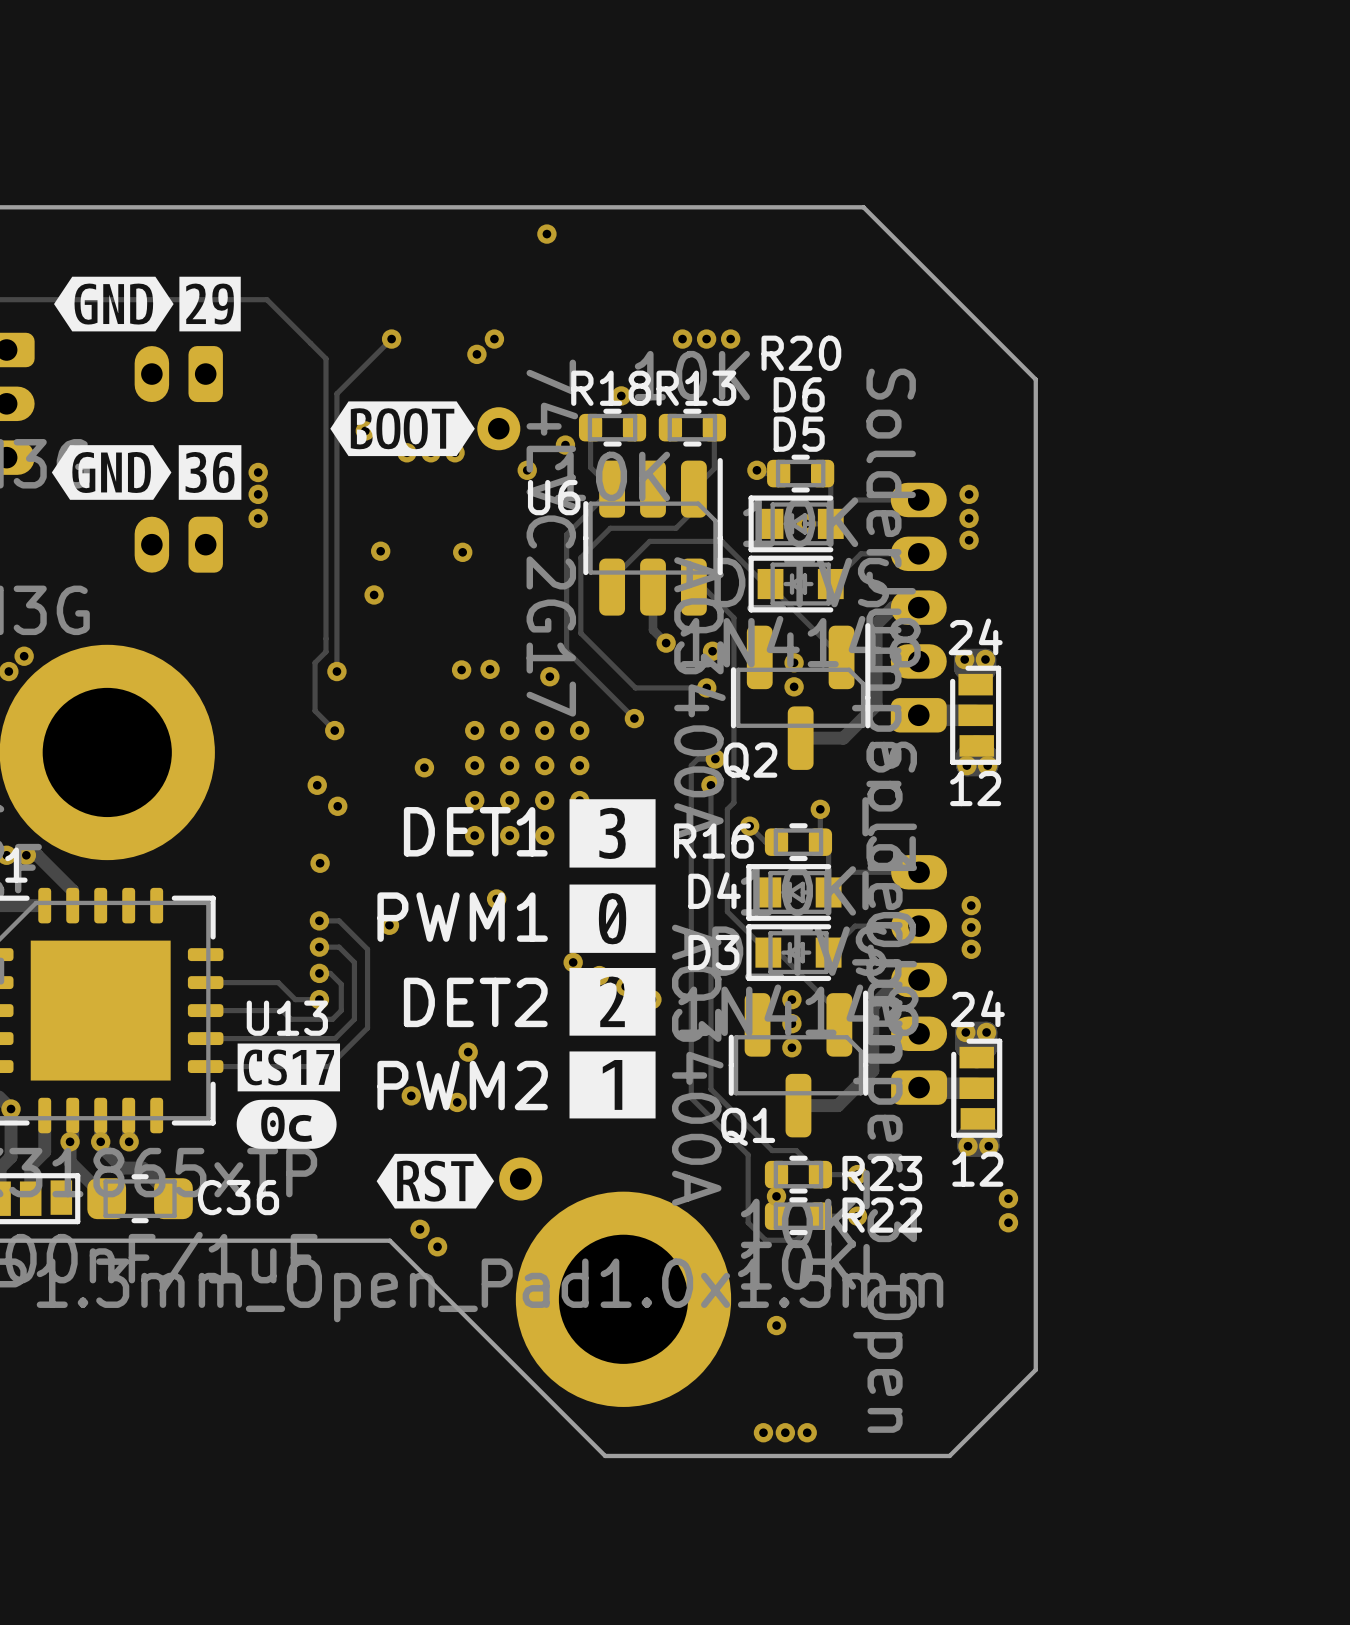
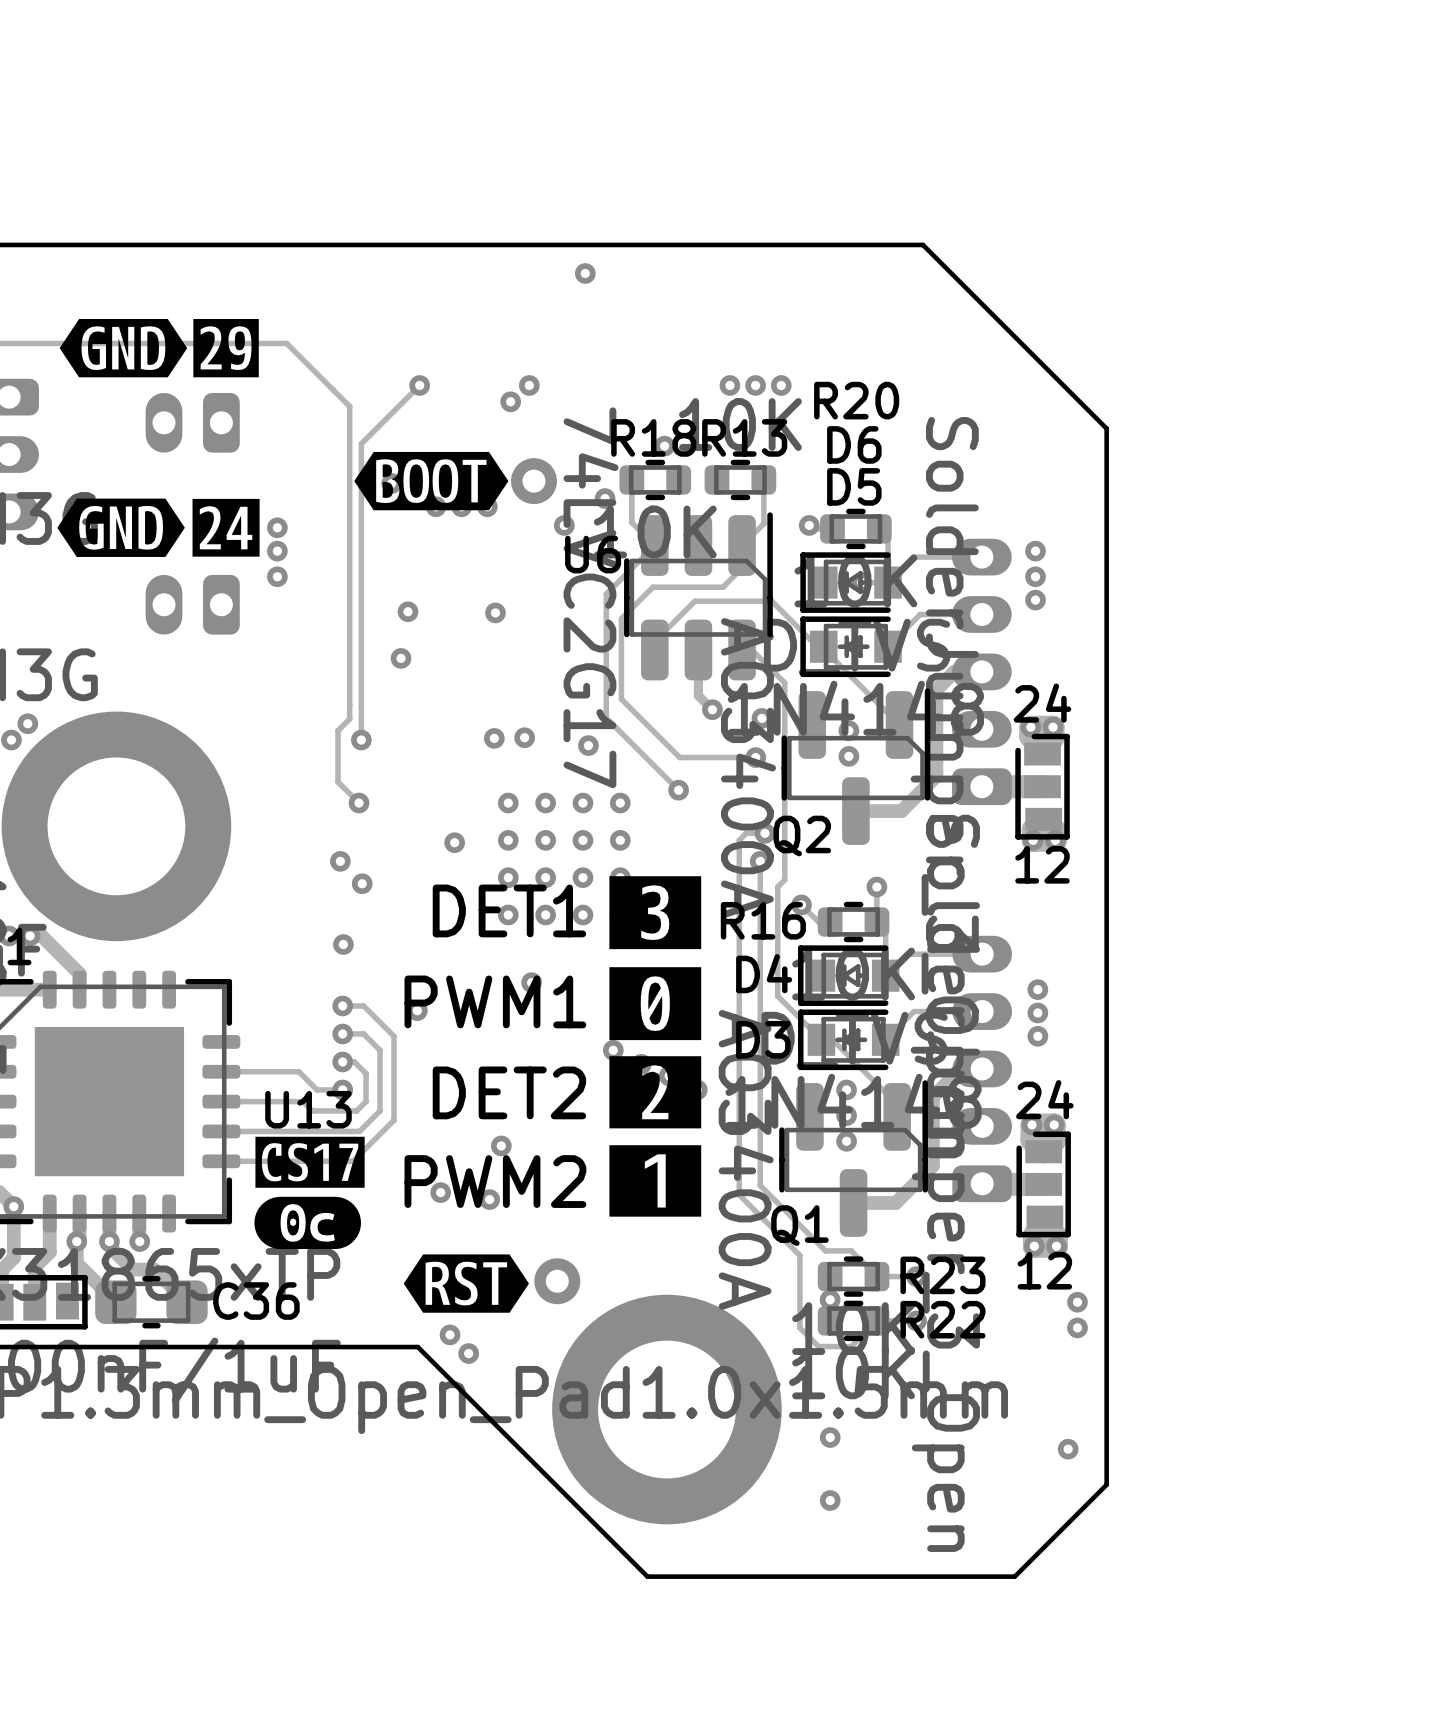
drawing shape: [178, 445, 242, 500] -> [192, 498, 260, 557]
via: none -> (1068, 1449)
via: none -> (830, 1500)
via: (763, 1432) -> none
via: (785, 1432) -> none
via: (807, 1432) -> none

